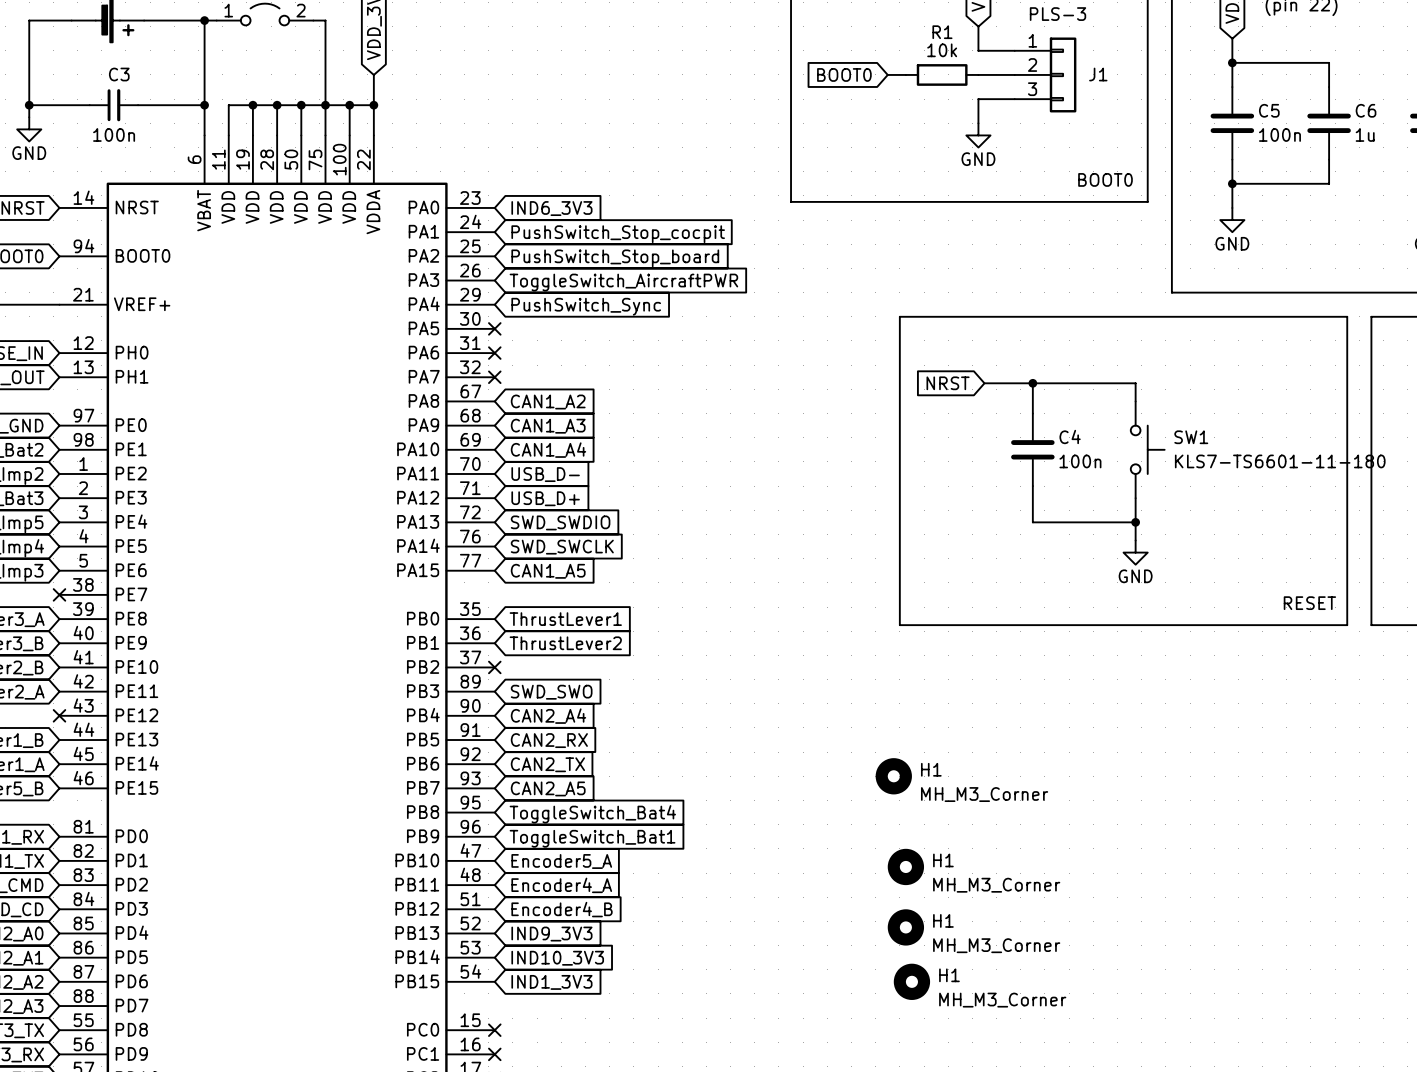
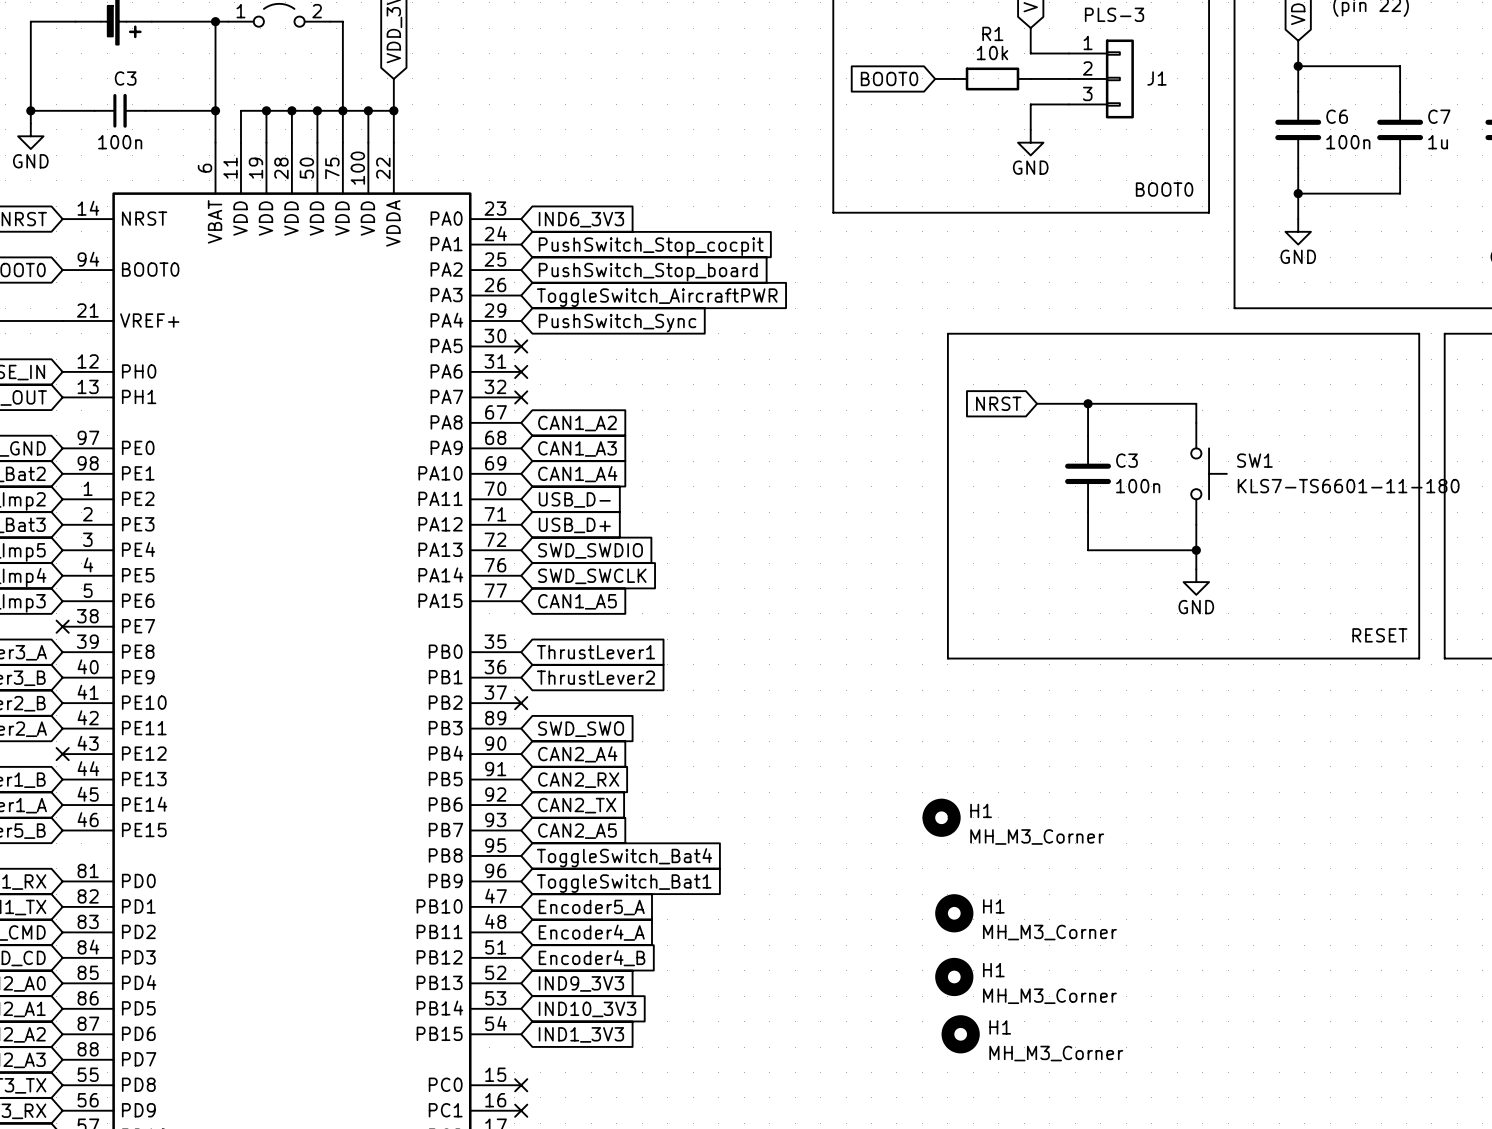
C5 name: C5 (1269, 110) -> C6 (1337, 116)
C6 name: C6 (1366, 110) -> C7 (1439, 116)
C4 name: C4 (1070, 436) -> C3 (1126, 460)

